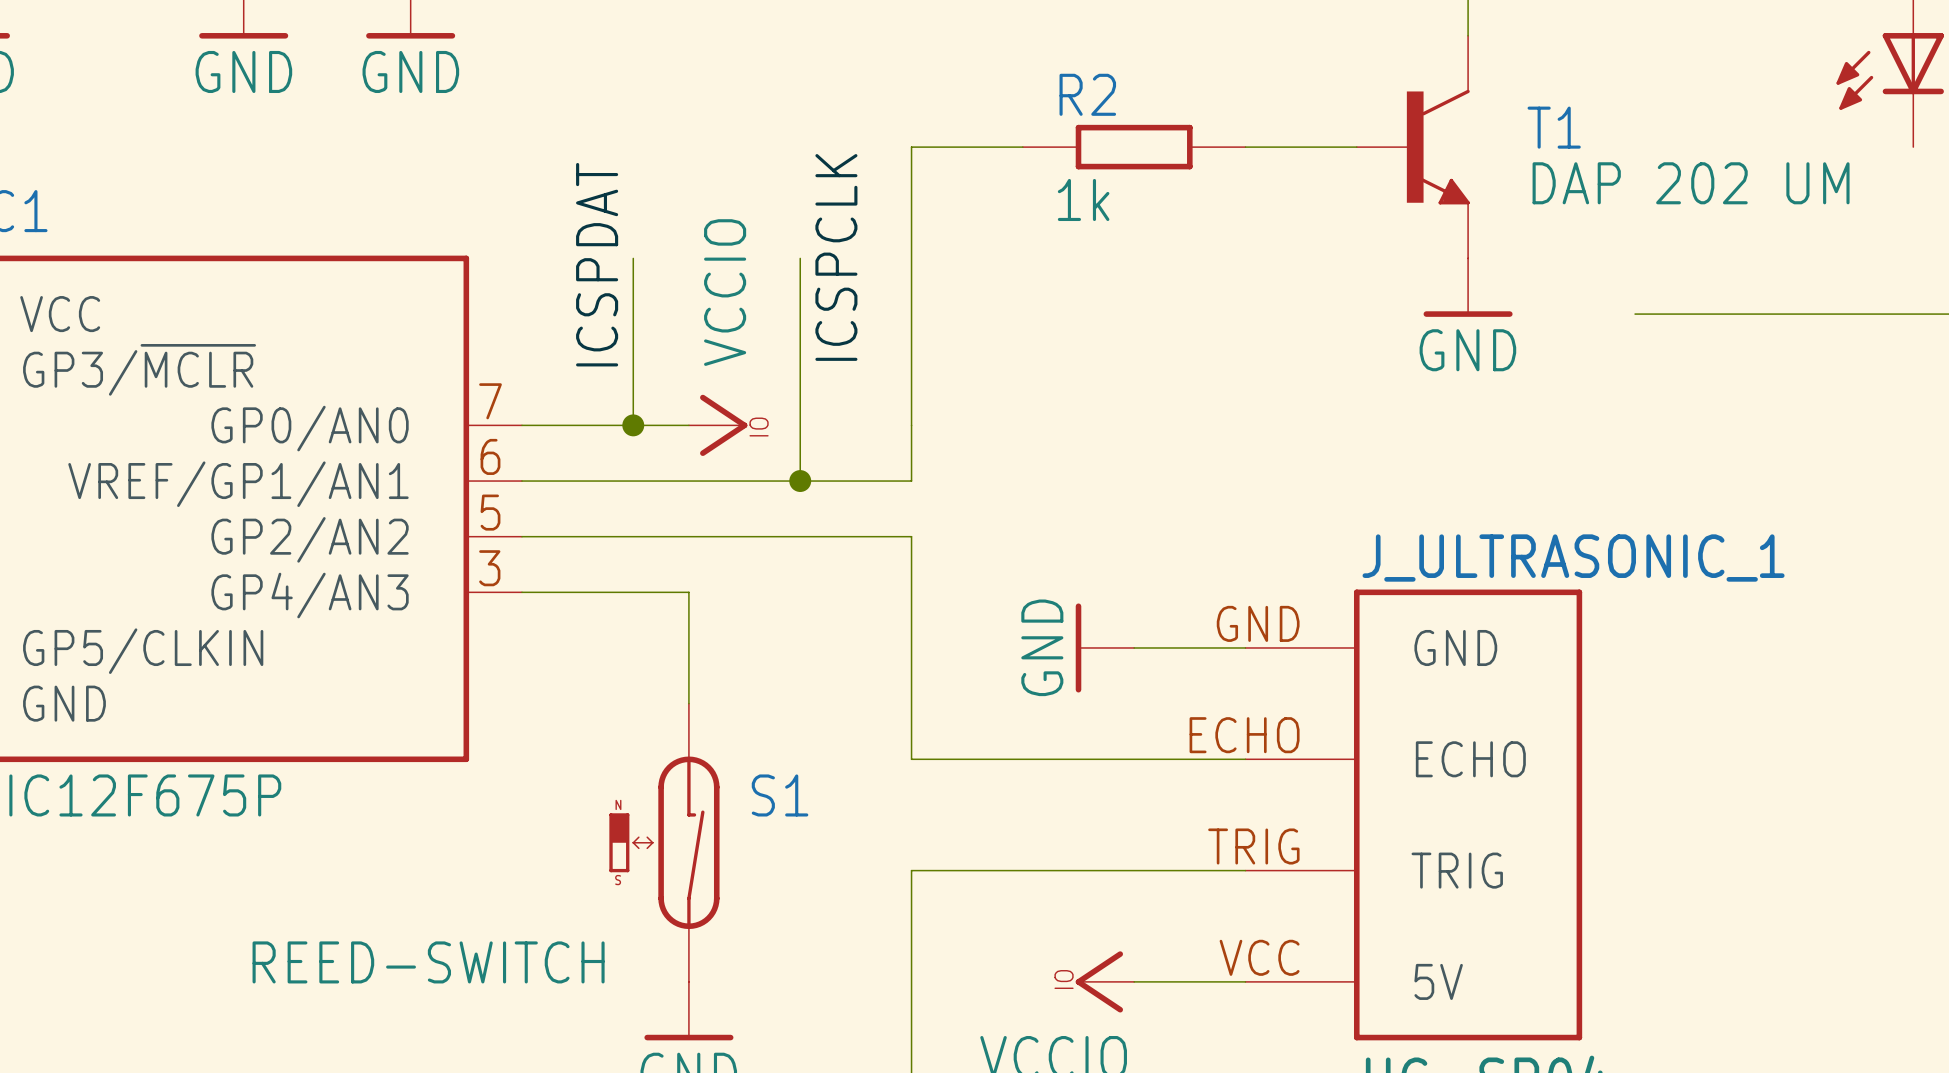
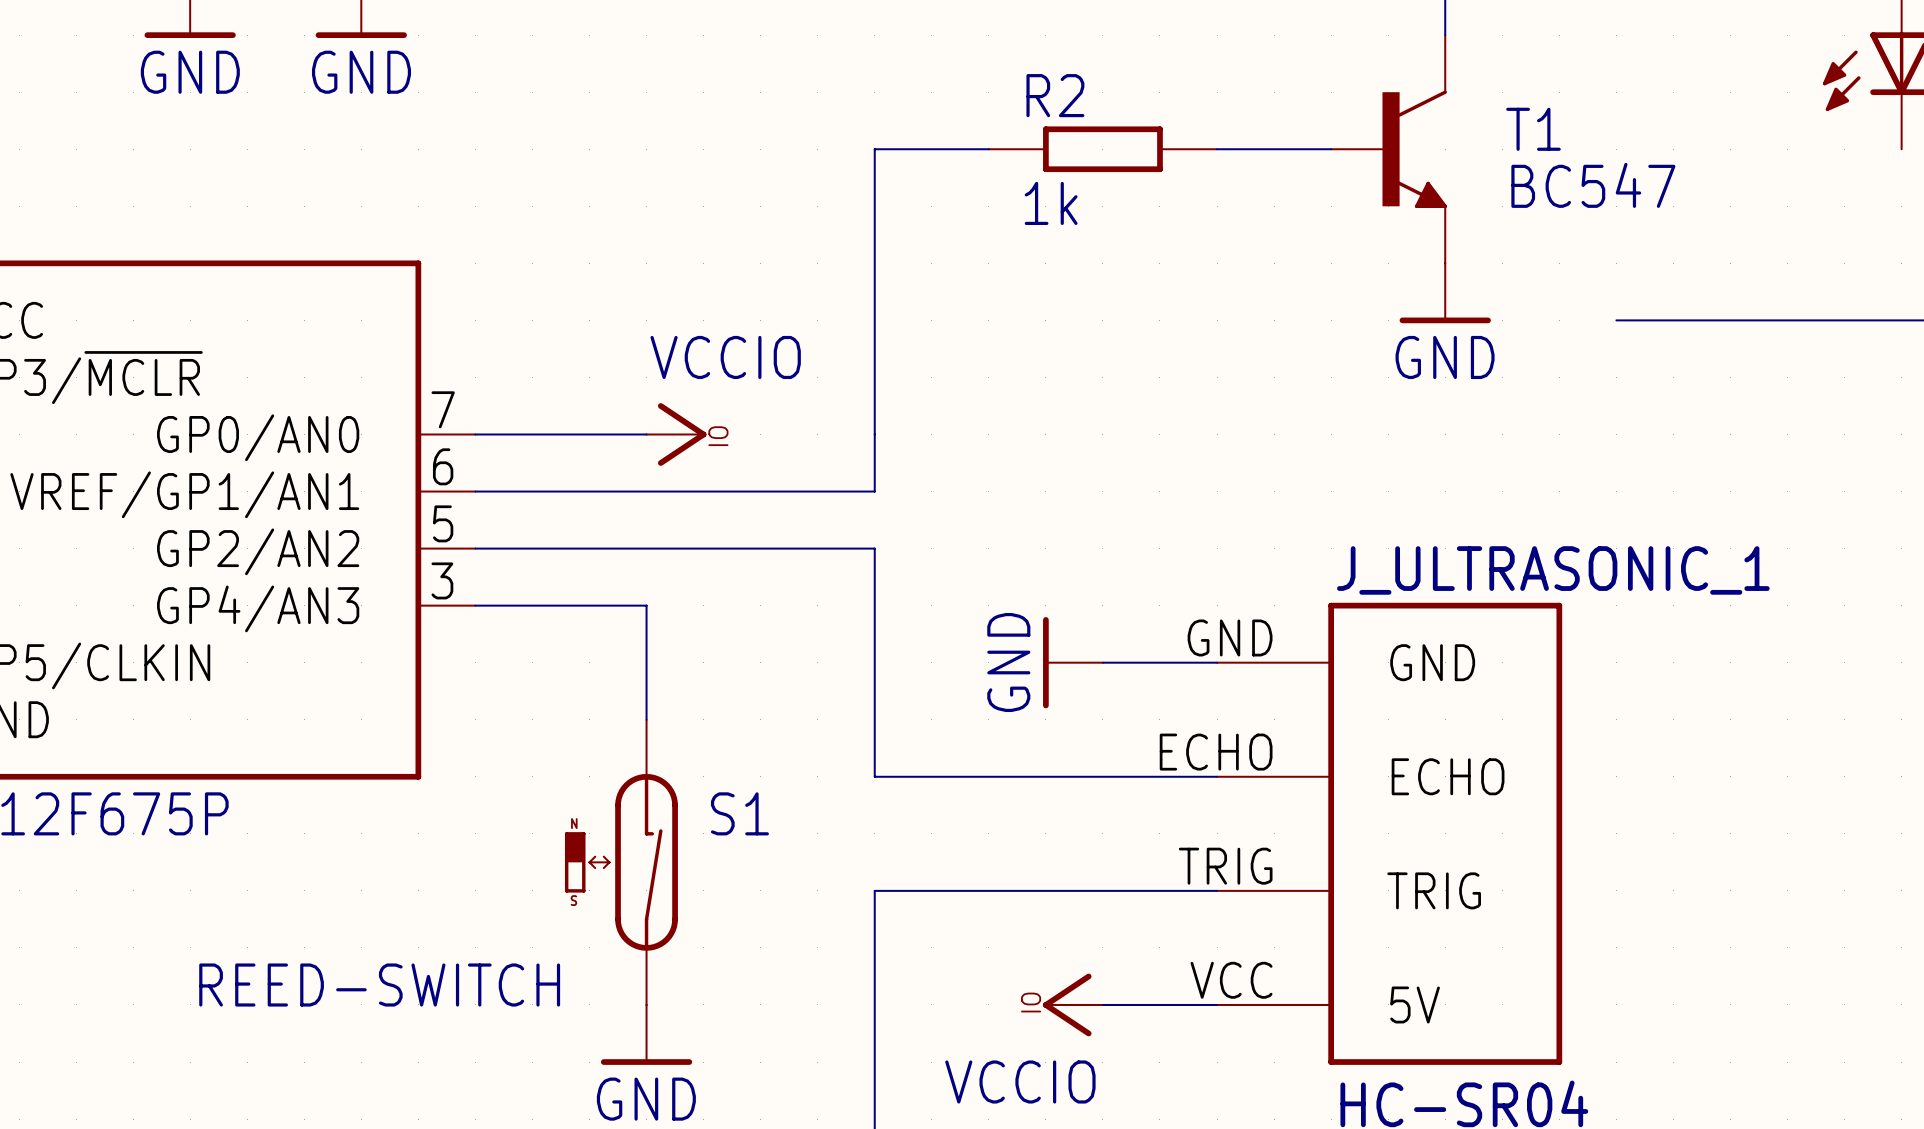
T1 value: DAP 202 UM (1691, 183) -> BC547 (1593, 185)
label: ICSPCLK (836, 257) -> none
wire: (633, 258) (633, 425) -> none
wire: (800, 258) (800, 481) -> none
label: ICSPDAT (597, 264) -> none
power symbol text rotation: 0° (725, 292) -> 90° clockwise (725, 357)
junction: (633, 425) -> none
junction: (800, 481) -> none

